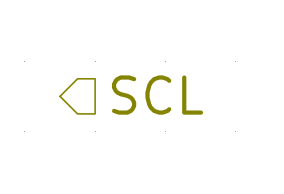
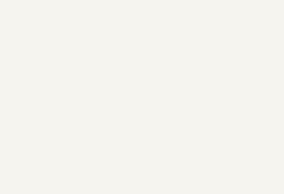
hierarchical label: SCL (157, 95) -> none

